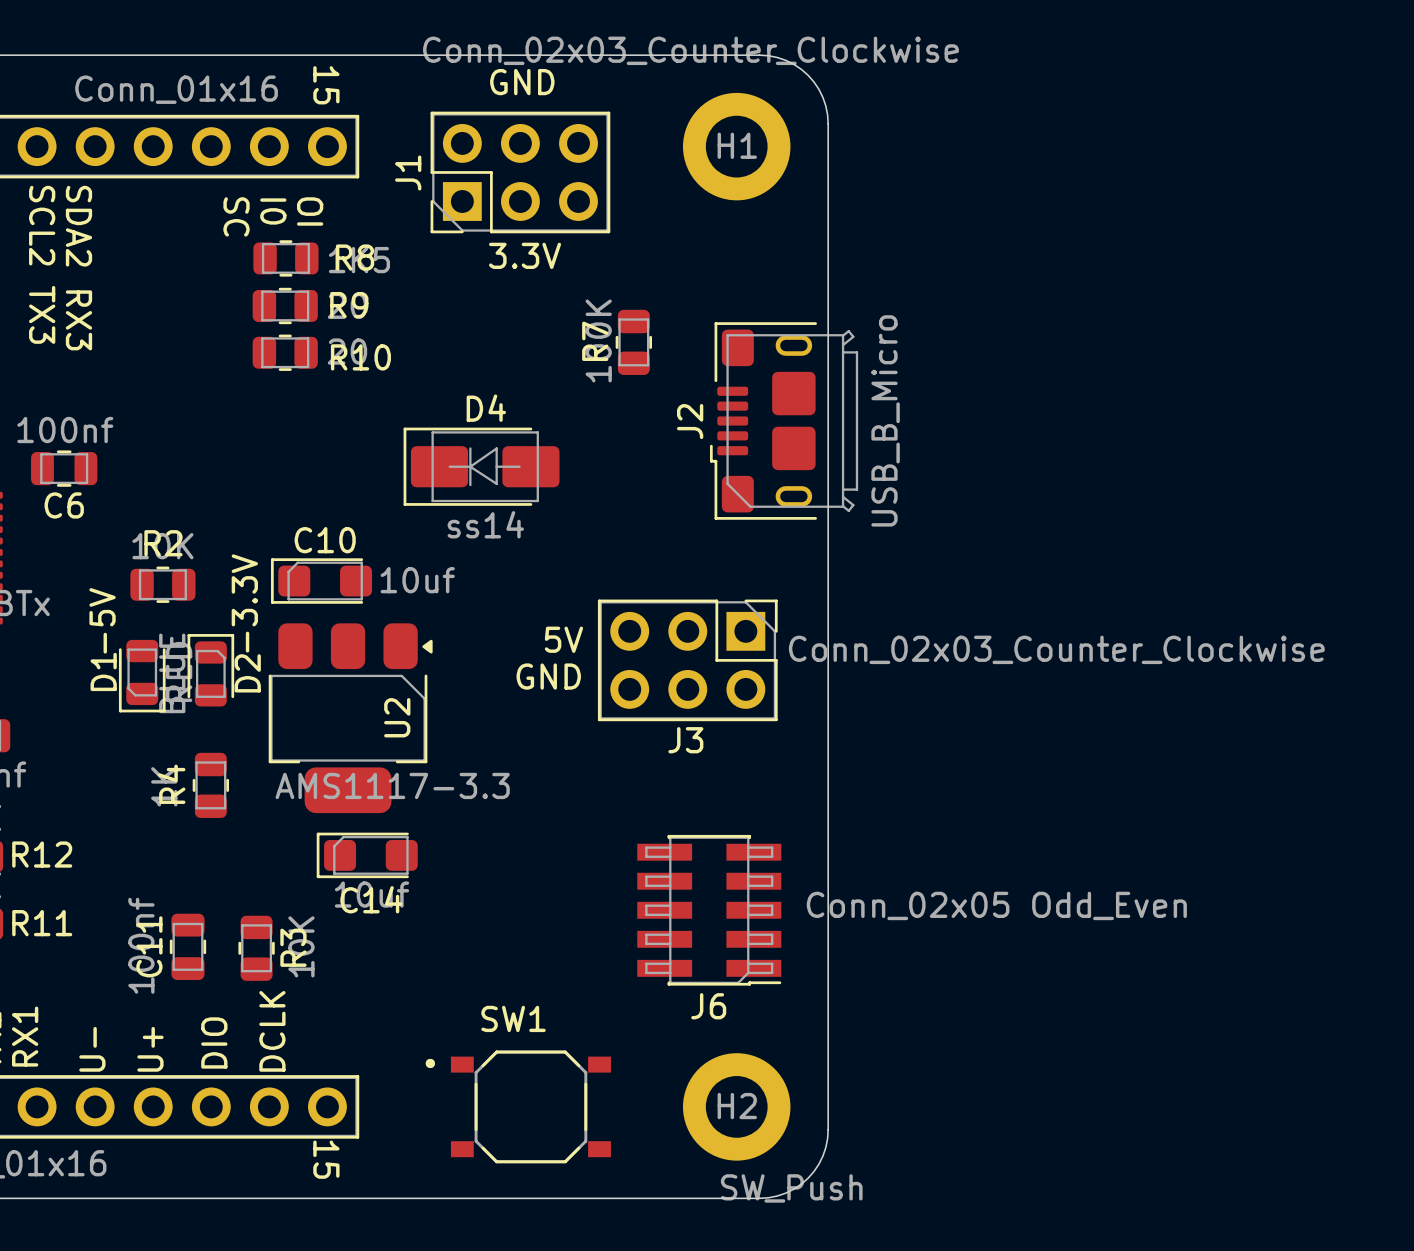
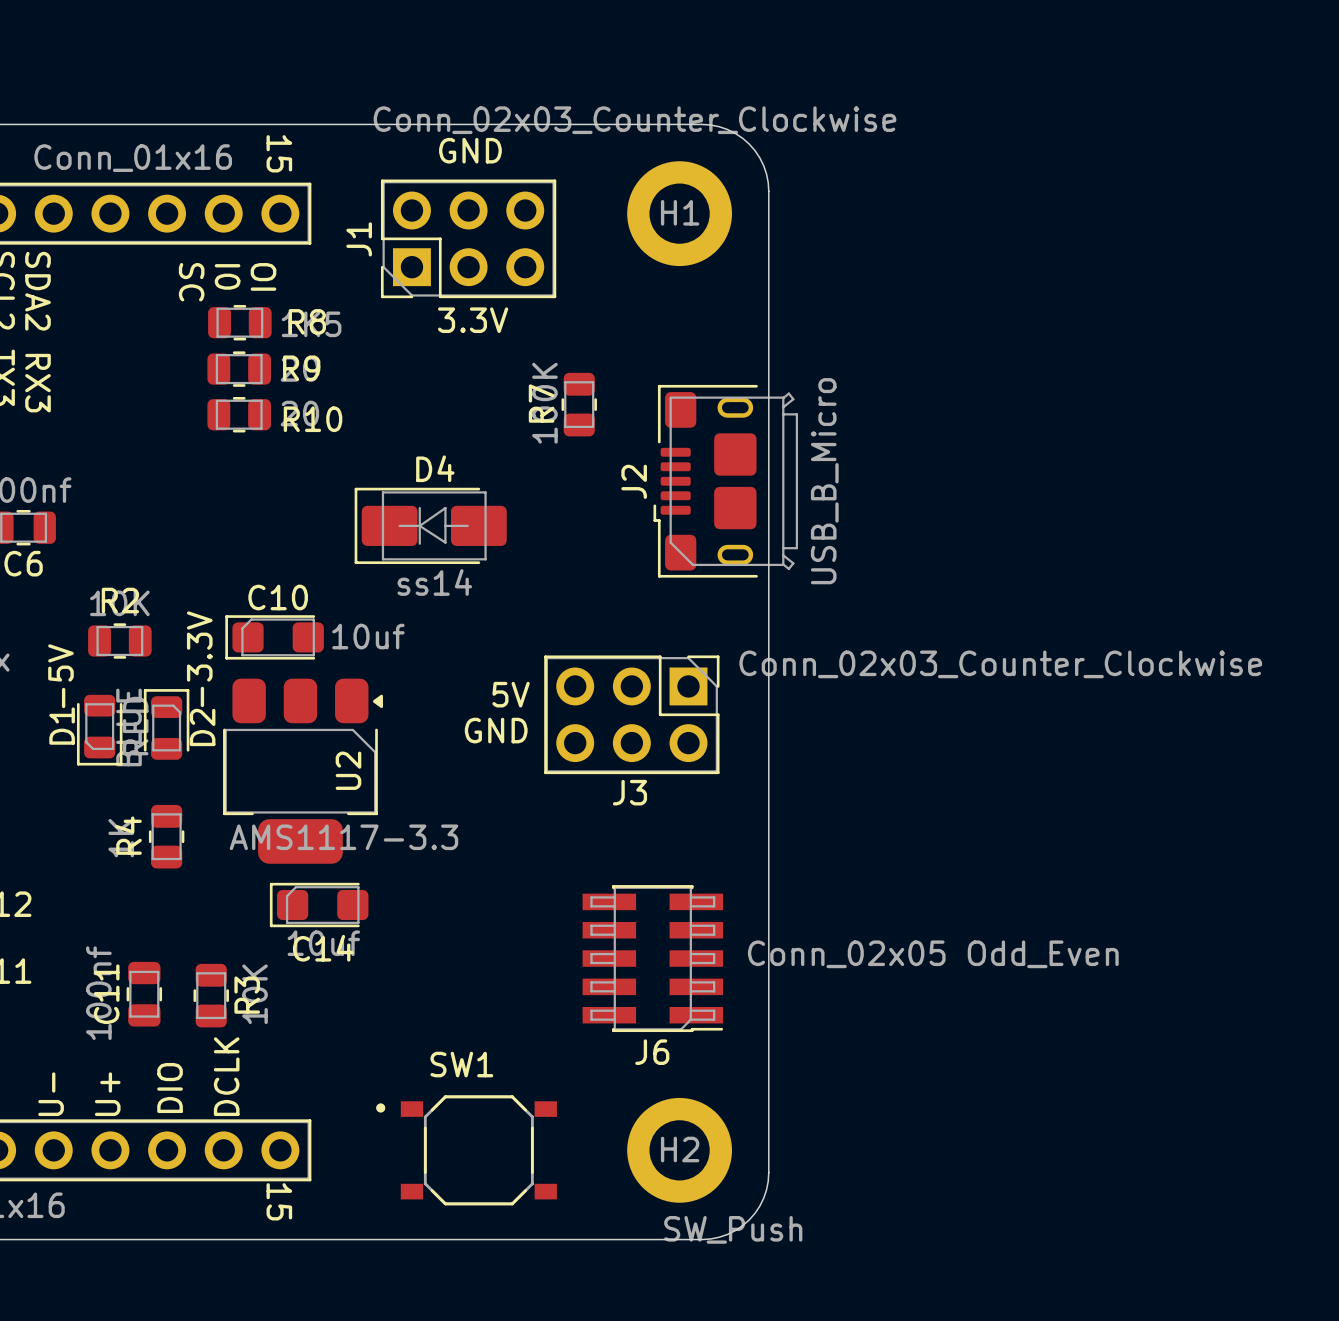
J3 value position: Conn_02x03_Counter_Clockwise (1056, 649) -> Conn_02x03_Counter_Clockwise (1000, 664)

